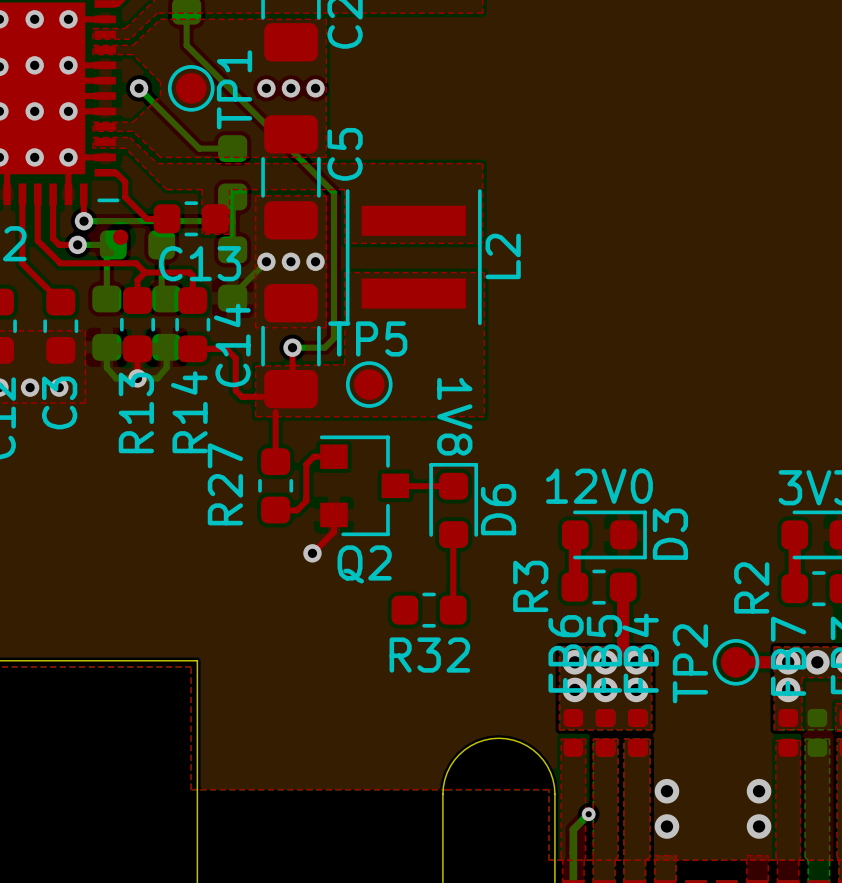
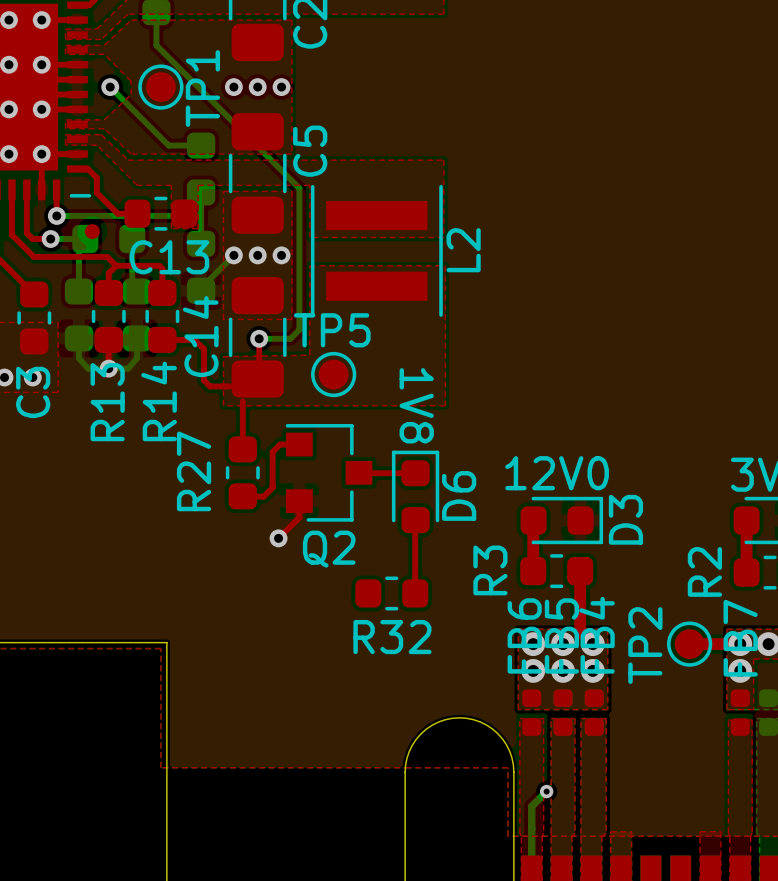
via: (666, 791) -> none
via: (759, 791) -> none
via: (666, 826) -> none
via: (759, 826) -> none

